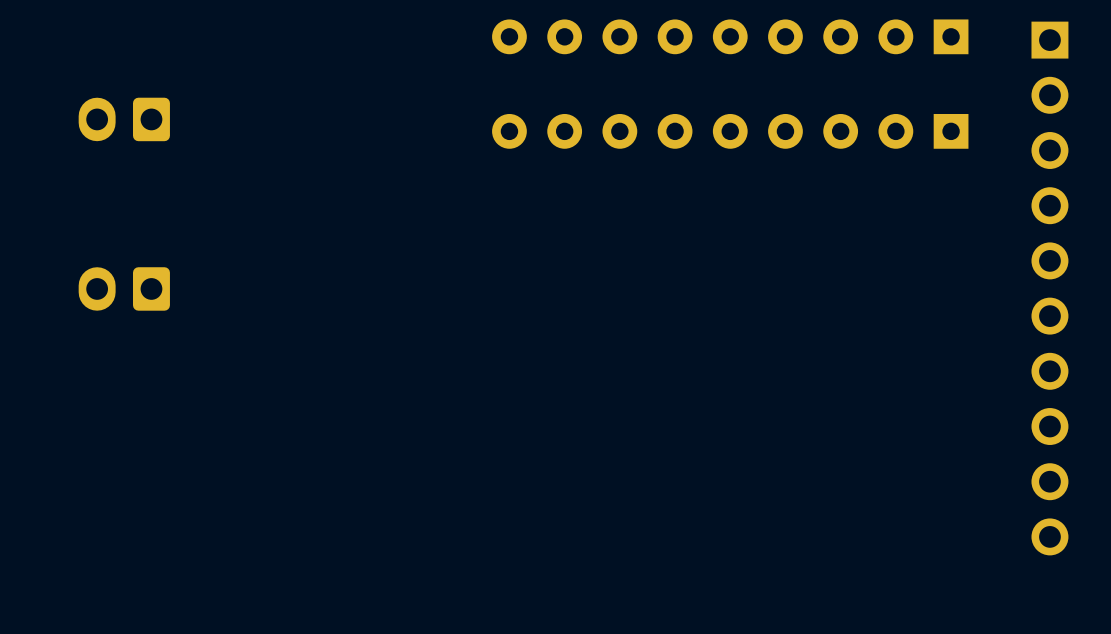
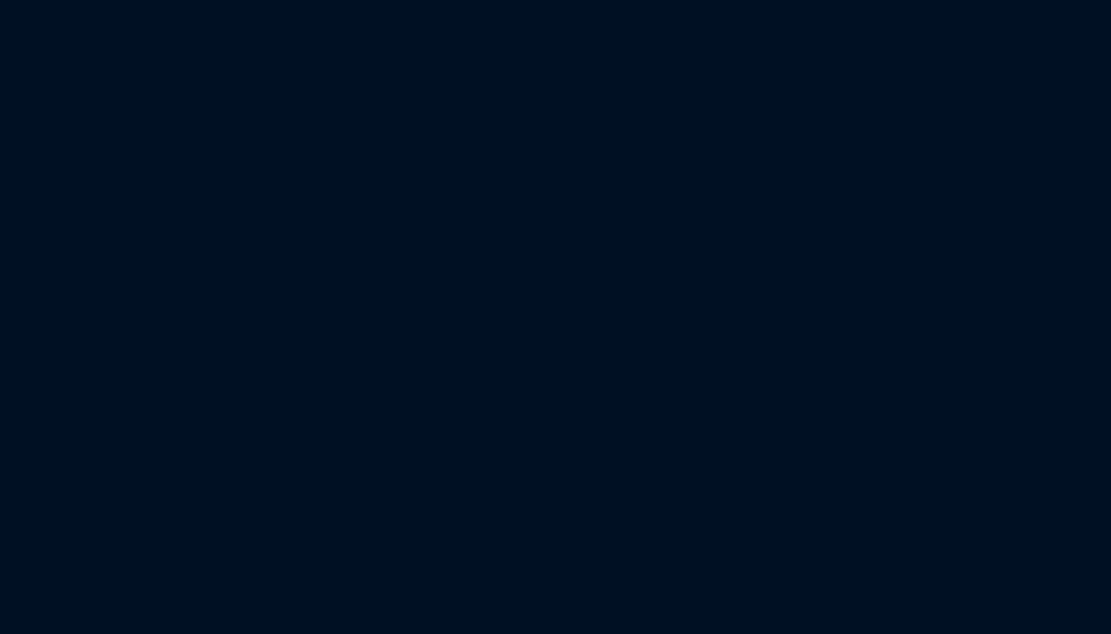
part: (730, 36) -> none
part: (124, 119) -> none
part: (730, 131) -> none
part: (124, 288) -> none
part: (1049, 288) -> none

